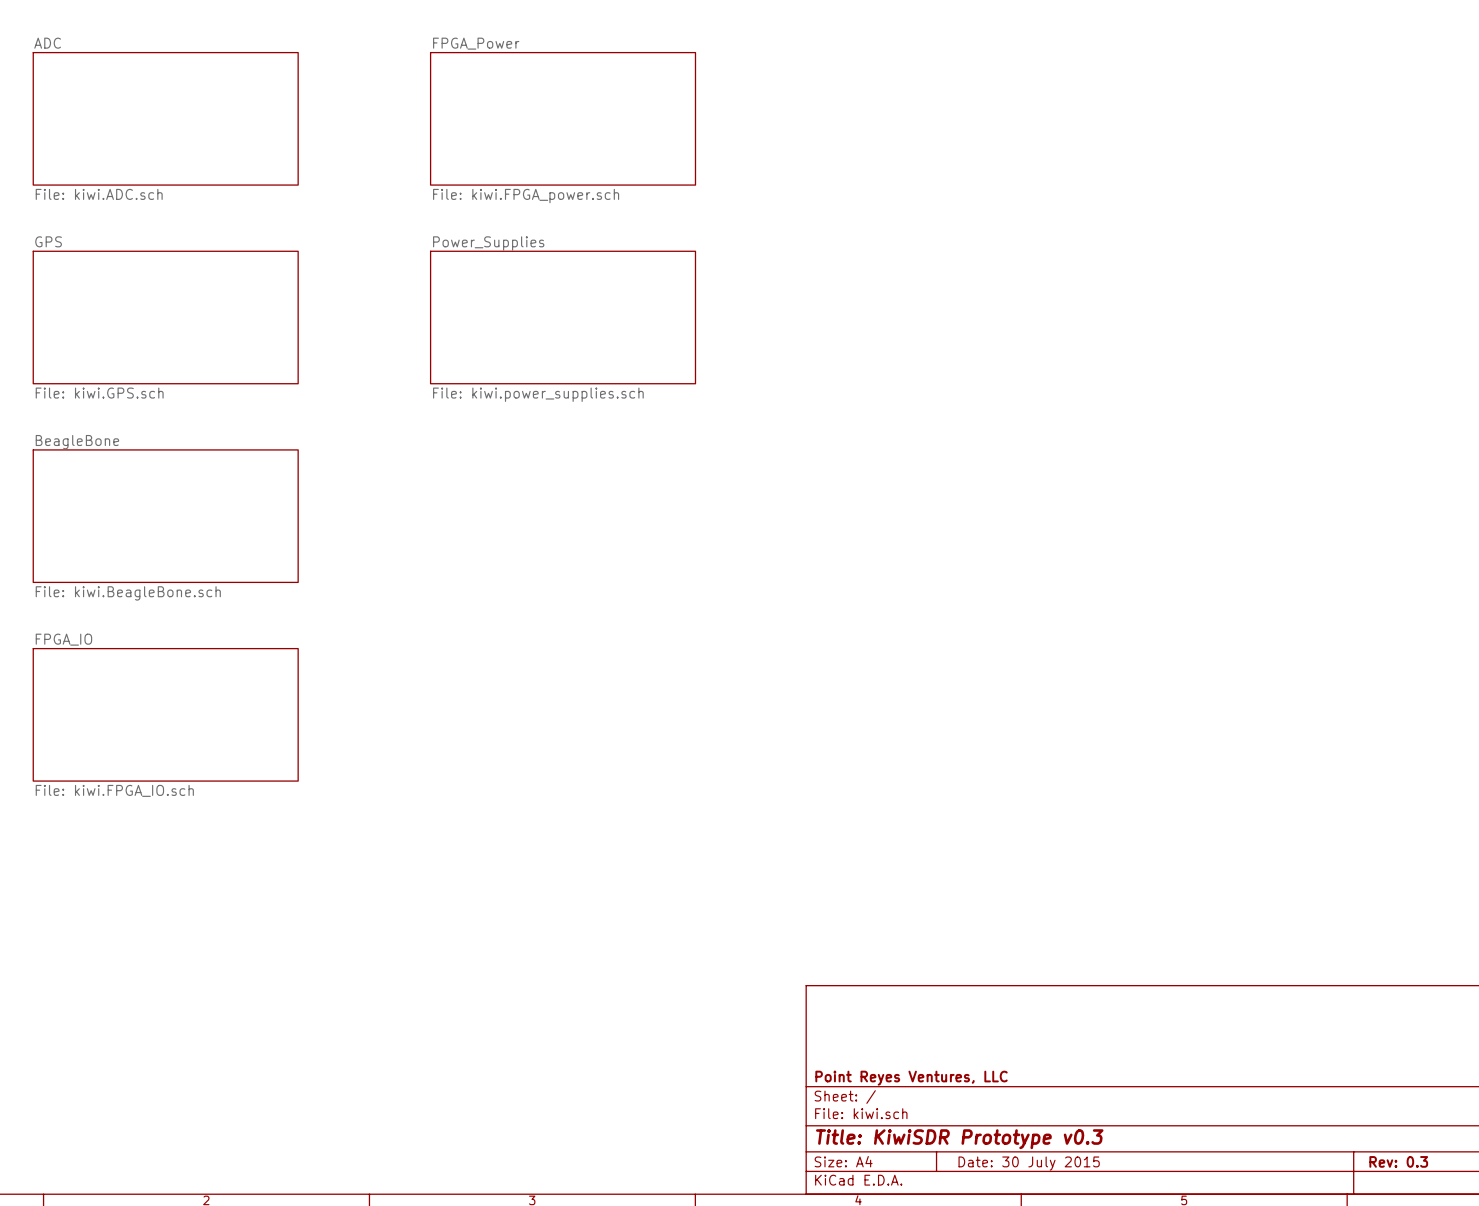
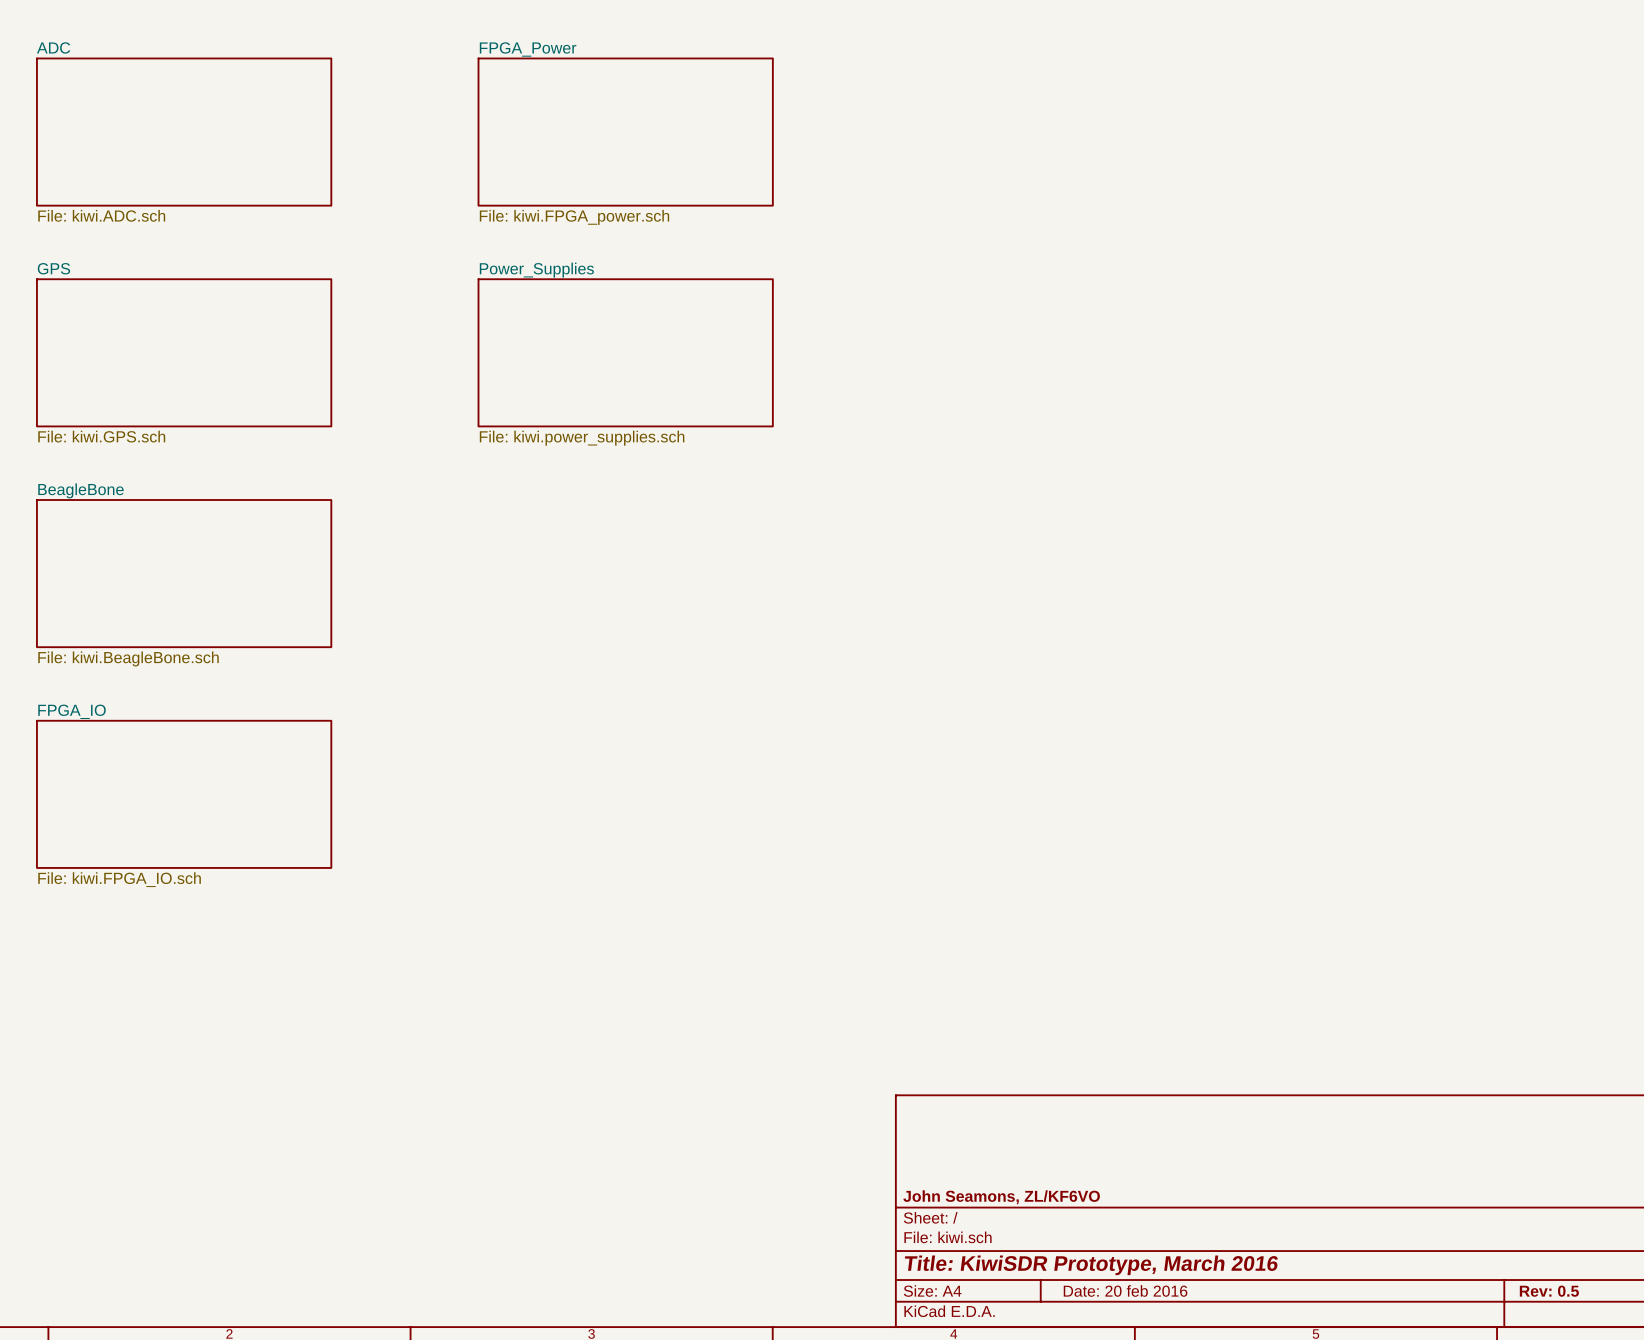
title block: Point Reyes Ventures, LLC (911, 1078) -> John Seamons, ZL/KF6VO (1001, 1197)
title block: Title: KiwiSDR Prototype v0.3 (959, 1139) -> Title: KiwiSDR Prototype, March 2016 (1091, 1265)
title block: Rev: 0.3 (1398, 1161) -> Rev: 0.5 (1549, 1291)
title block: Date: 30 July 2015 (1029, 1163) -> Date: 20 feb 2016 (1125, 1290)

